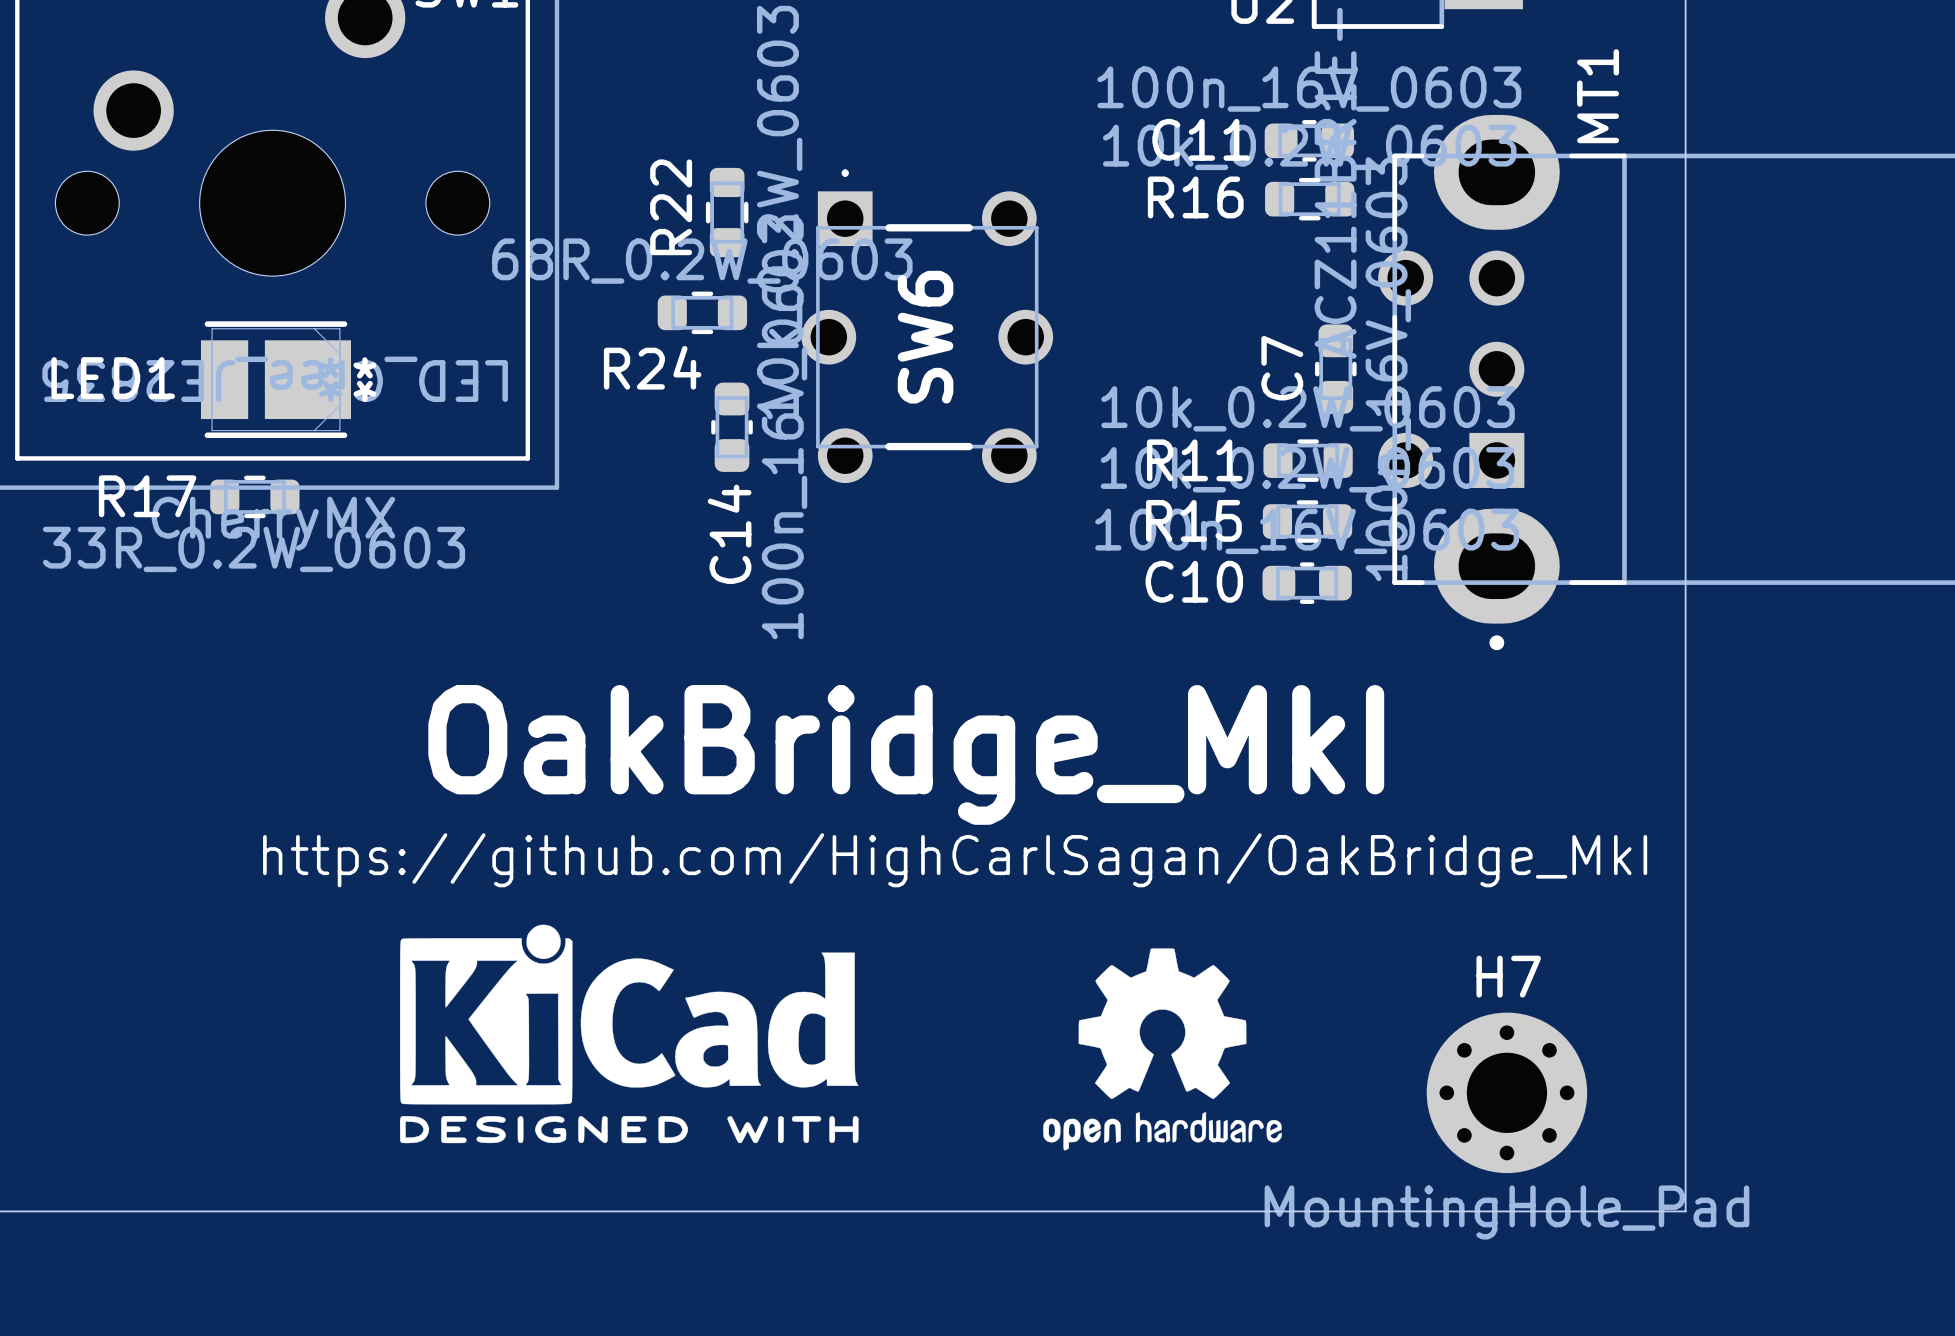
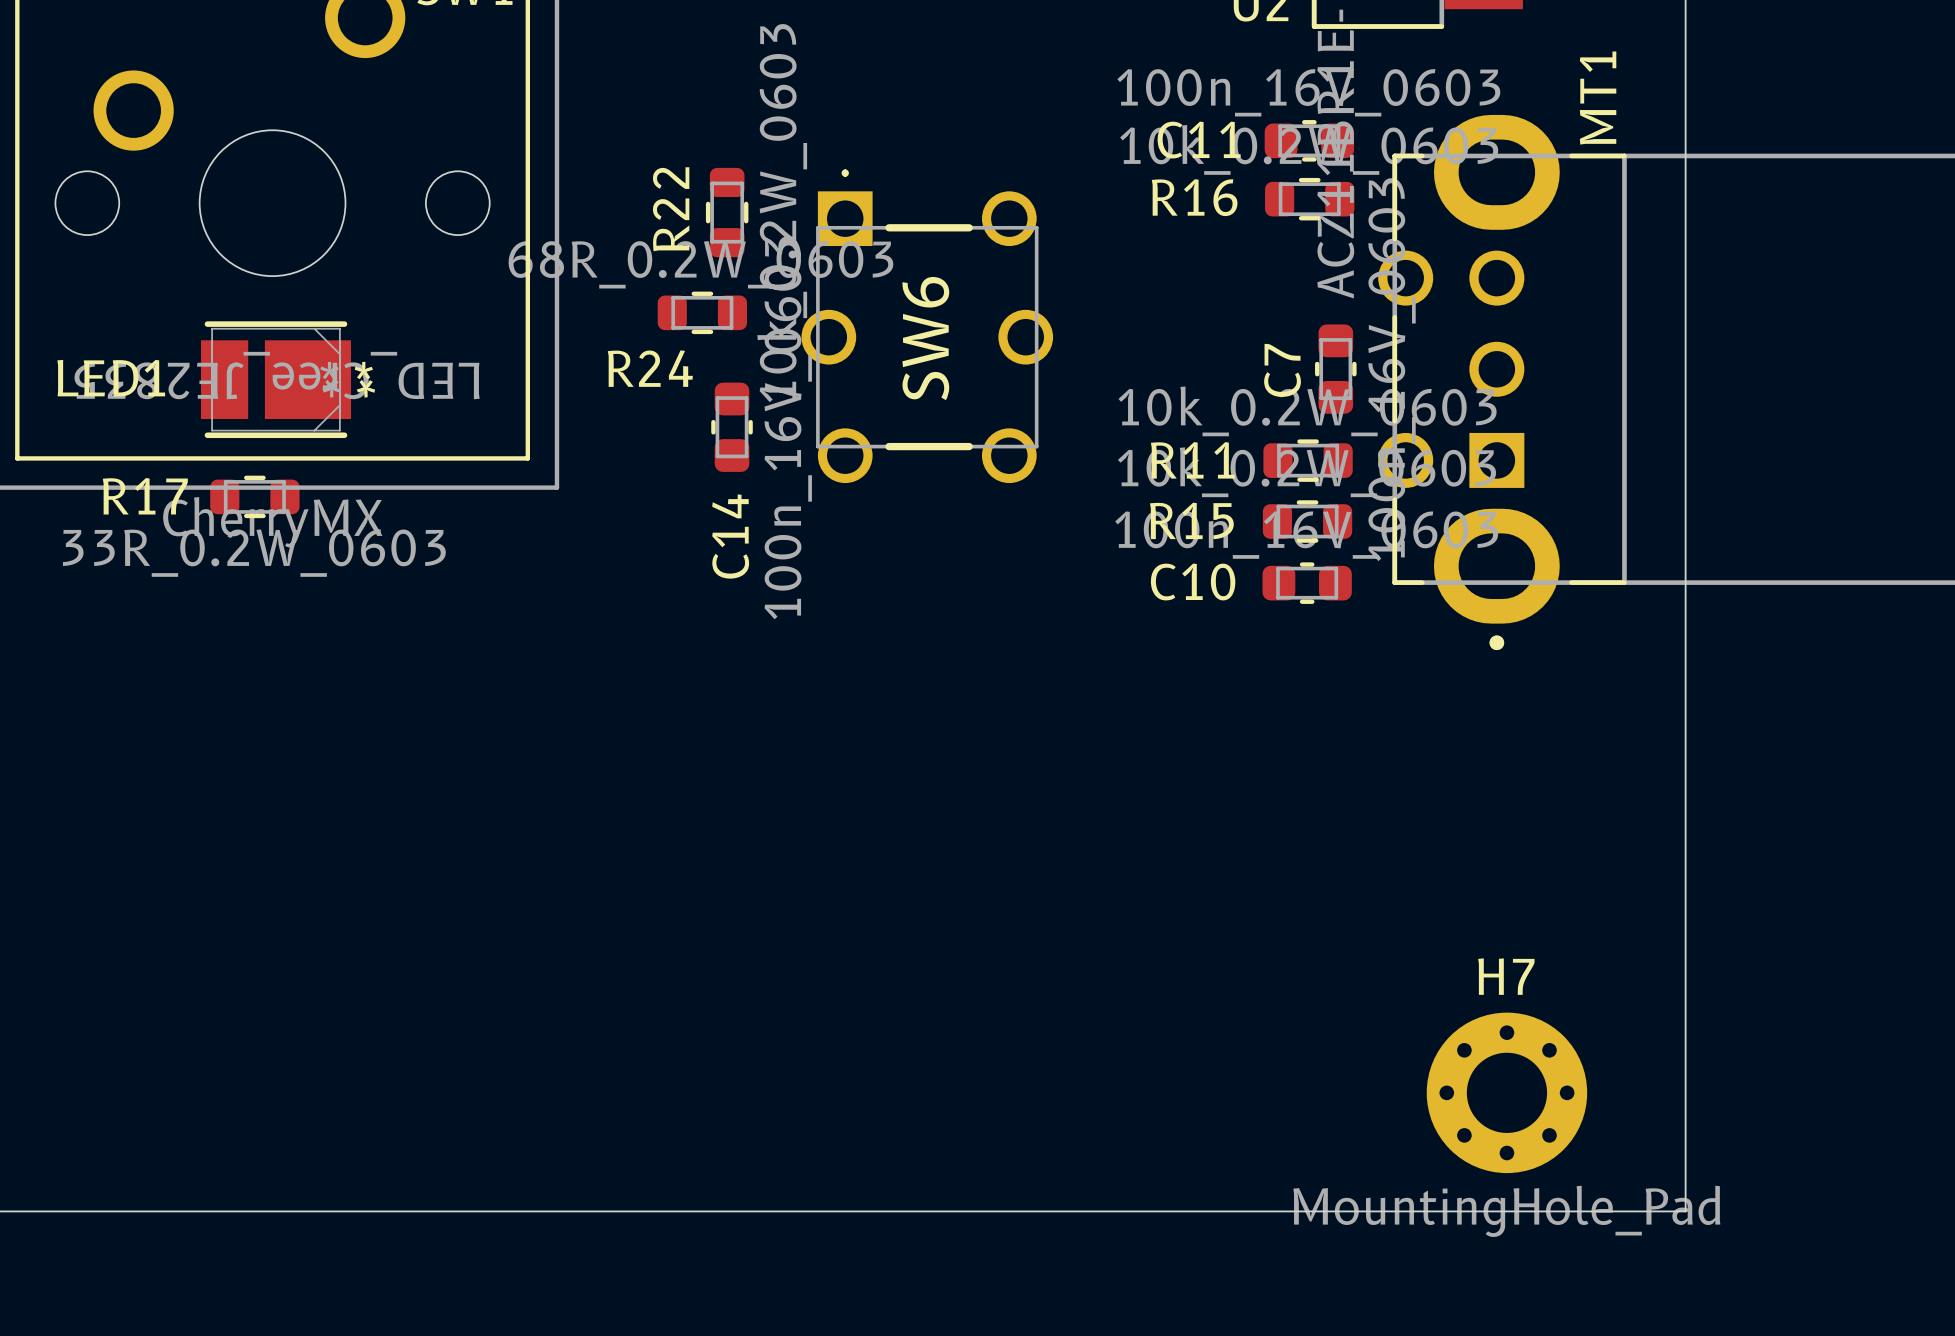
text: OakBridge_MkI (906, 754) -> none
text: https://github.com/HighCarlSagan/OakBridge_MkI (955, 860) -> none
drawing: [399, 924, 859, 1144] -> none
drawing: [1043, 948, 1282, 1151] -> none

